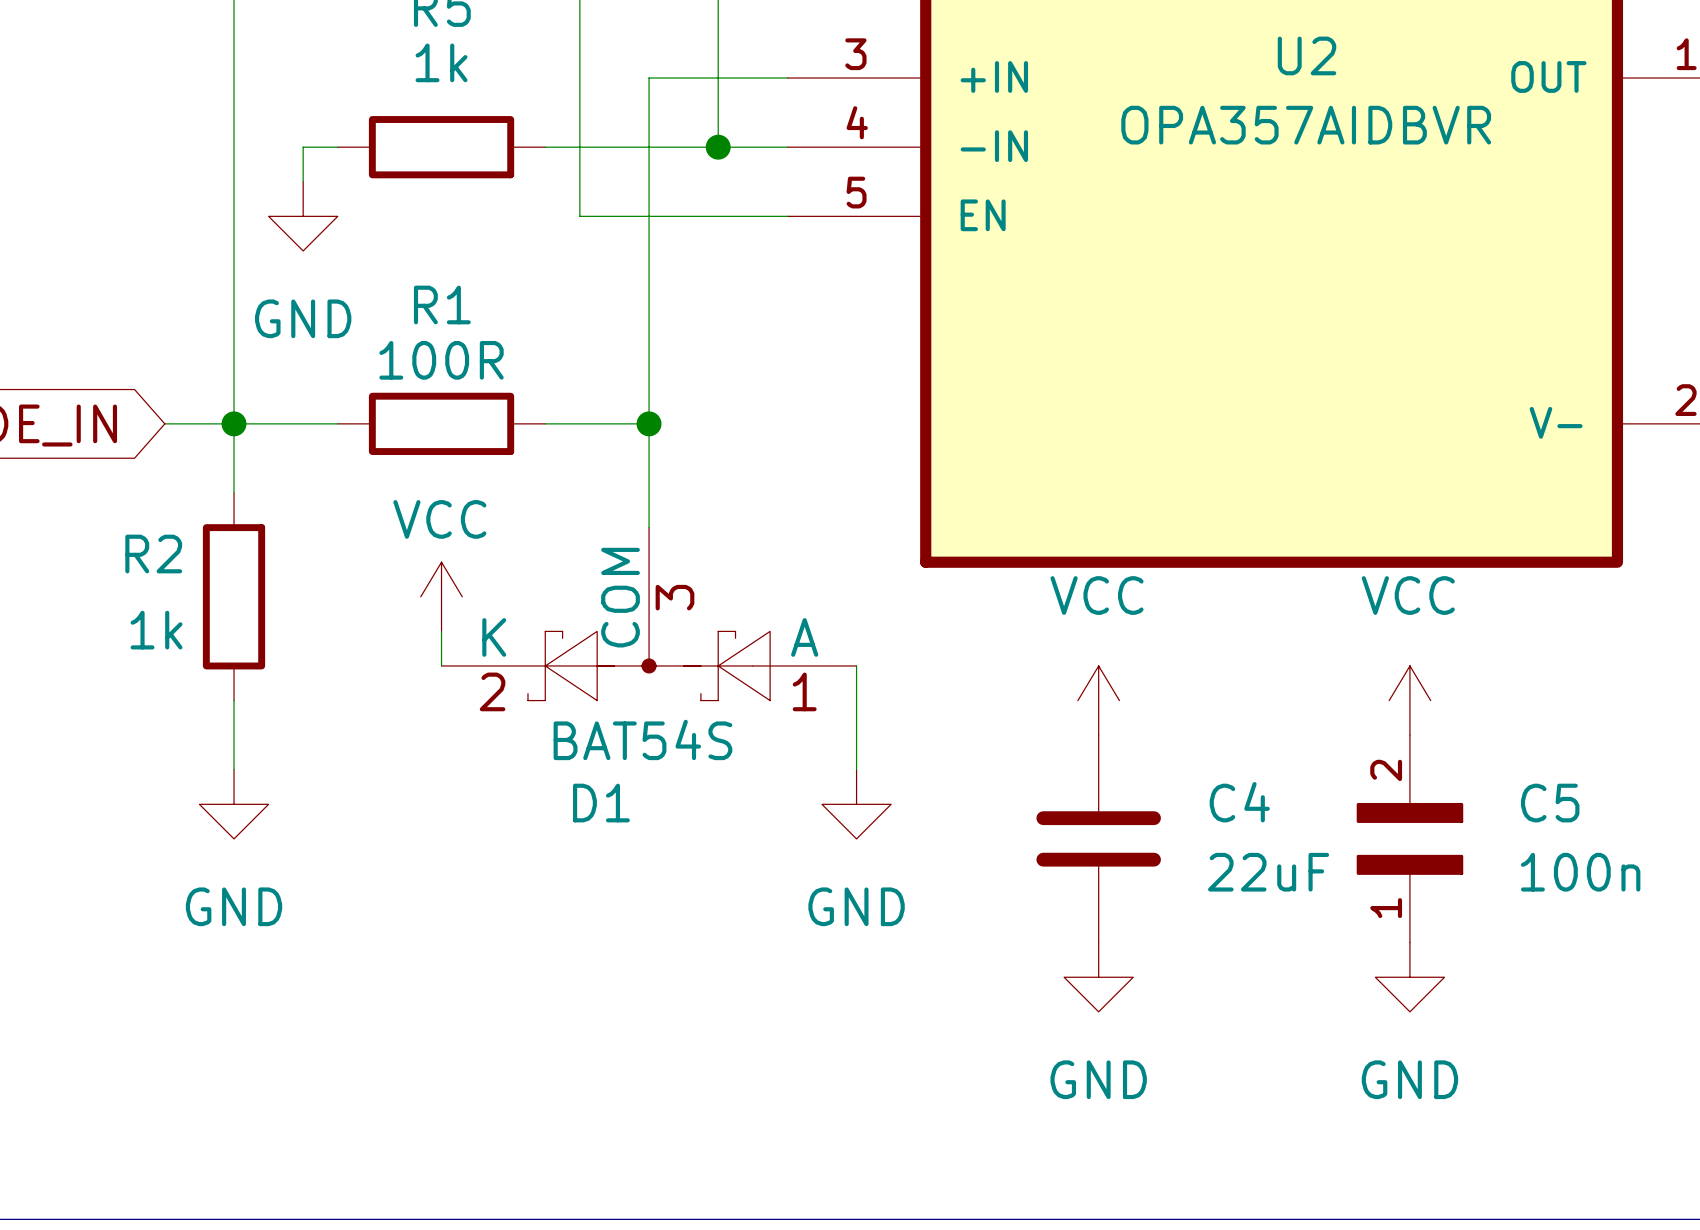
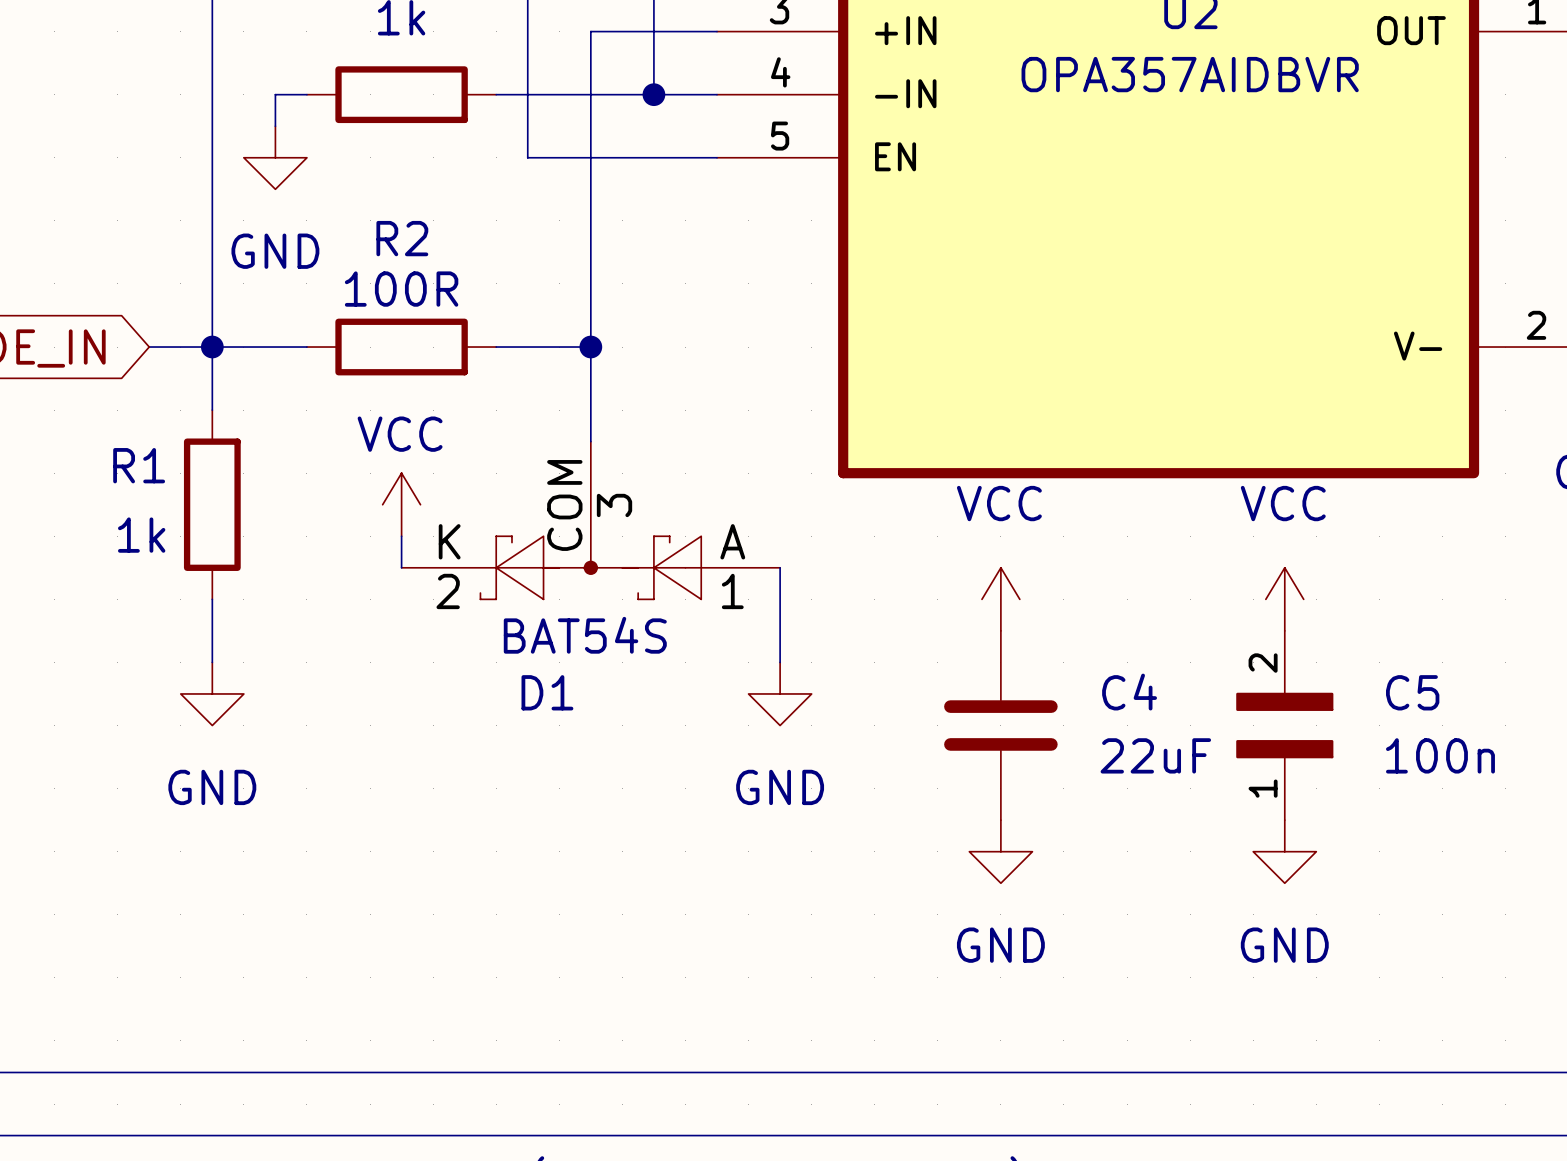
R1 name: R1 (442, 304) -> R2 (402, 238)
R2 name: R2 (153, 554) -> R1 (139, 465)

